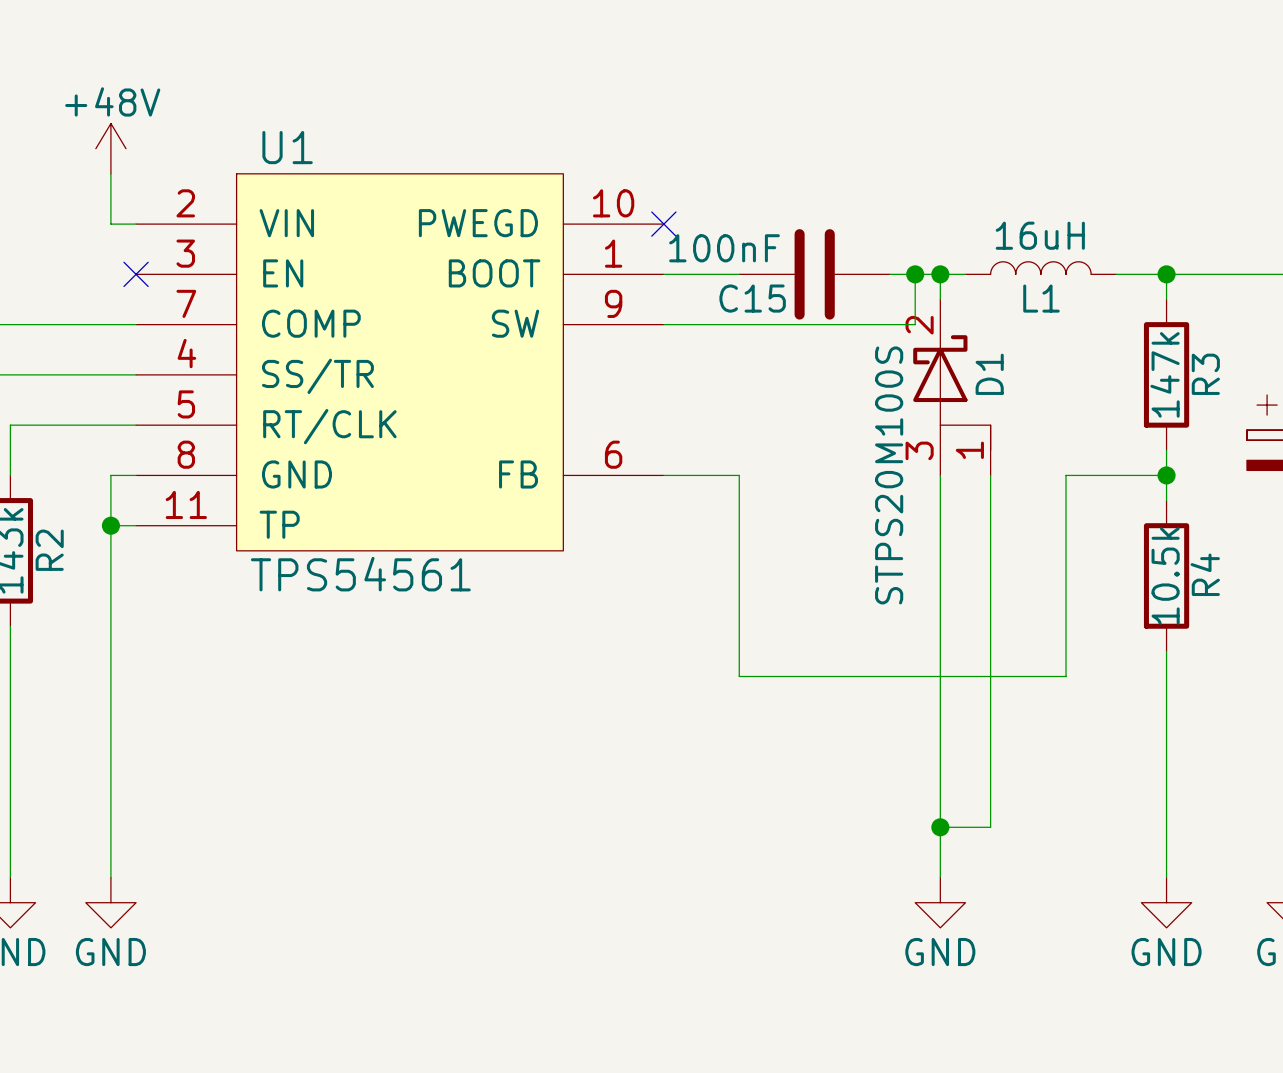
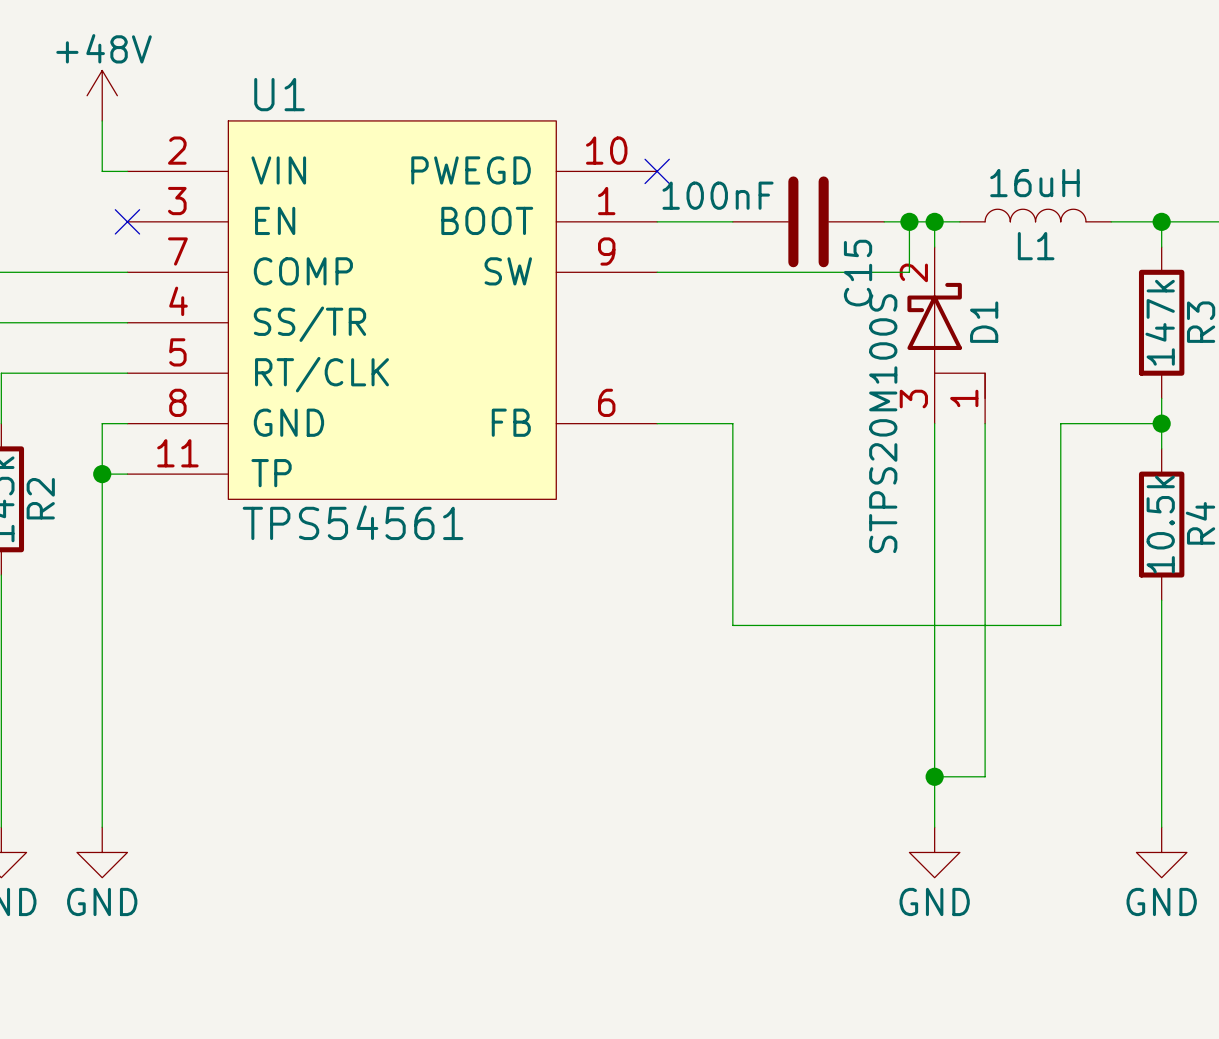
C15 name rotation: 0° (752, 298) -> 90° counterclockwise (858, 273)
C15 name position: C15 (752, 298) -> C15 (858, 273)

